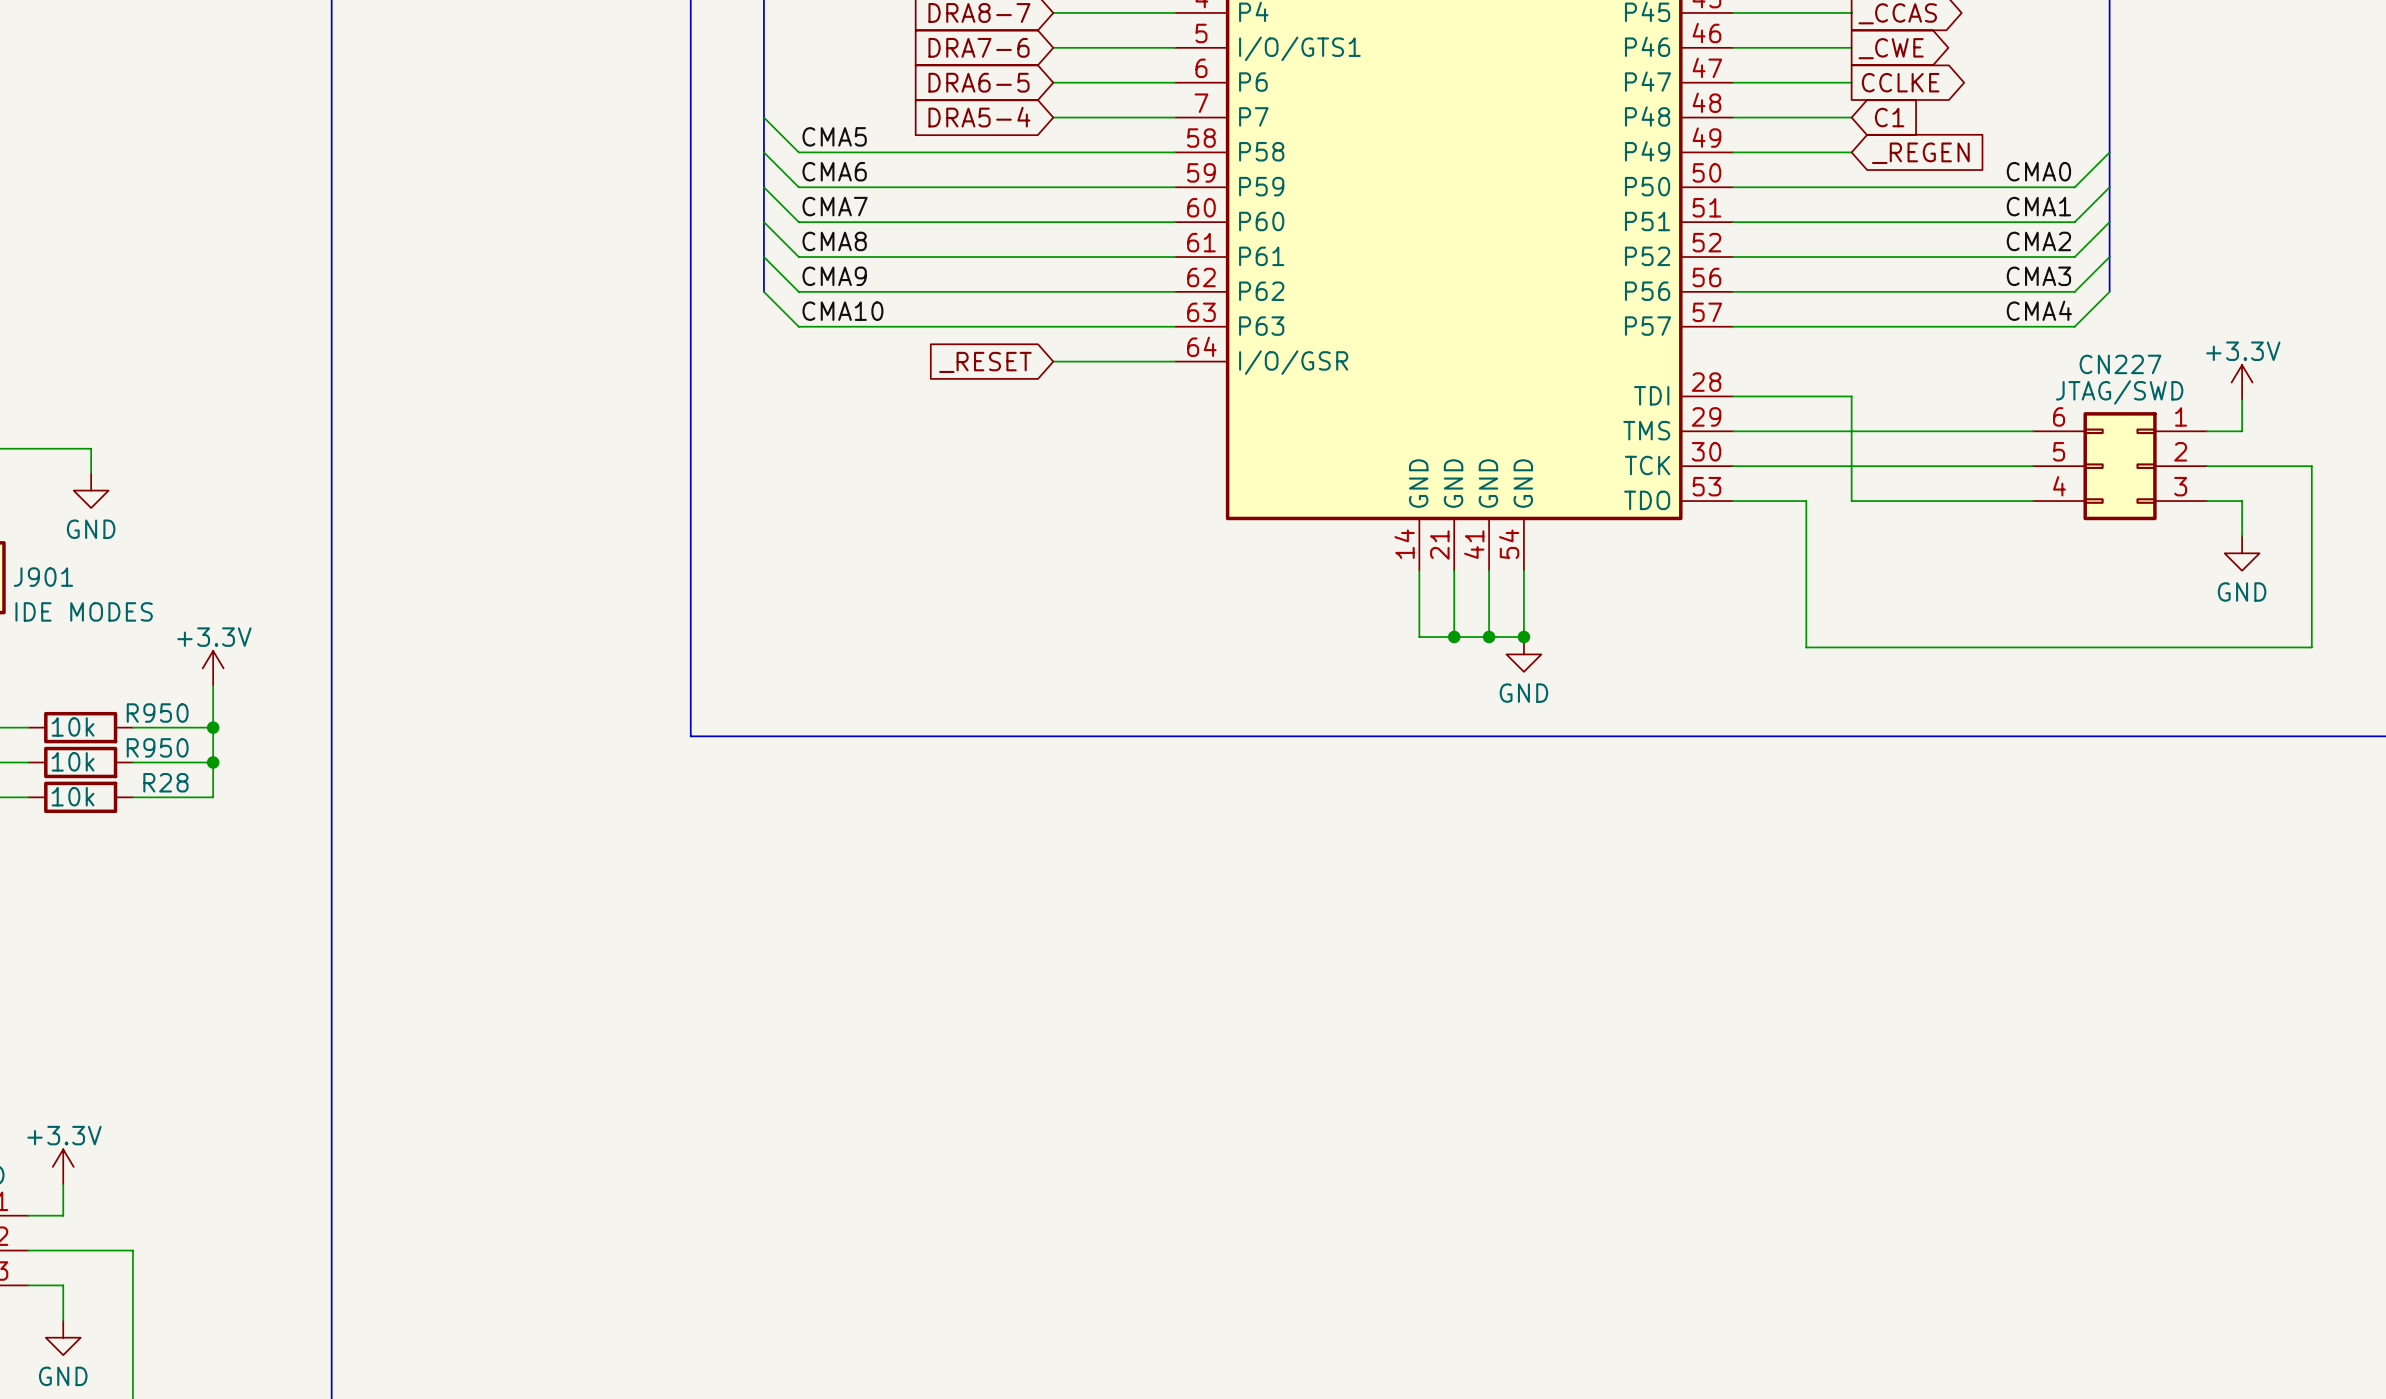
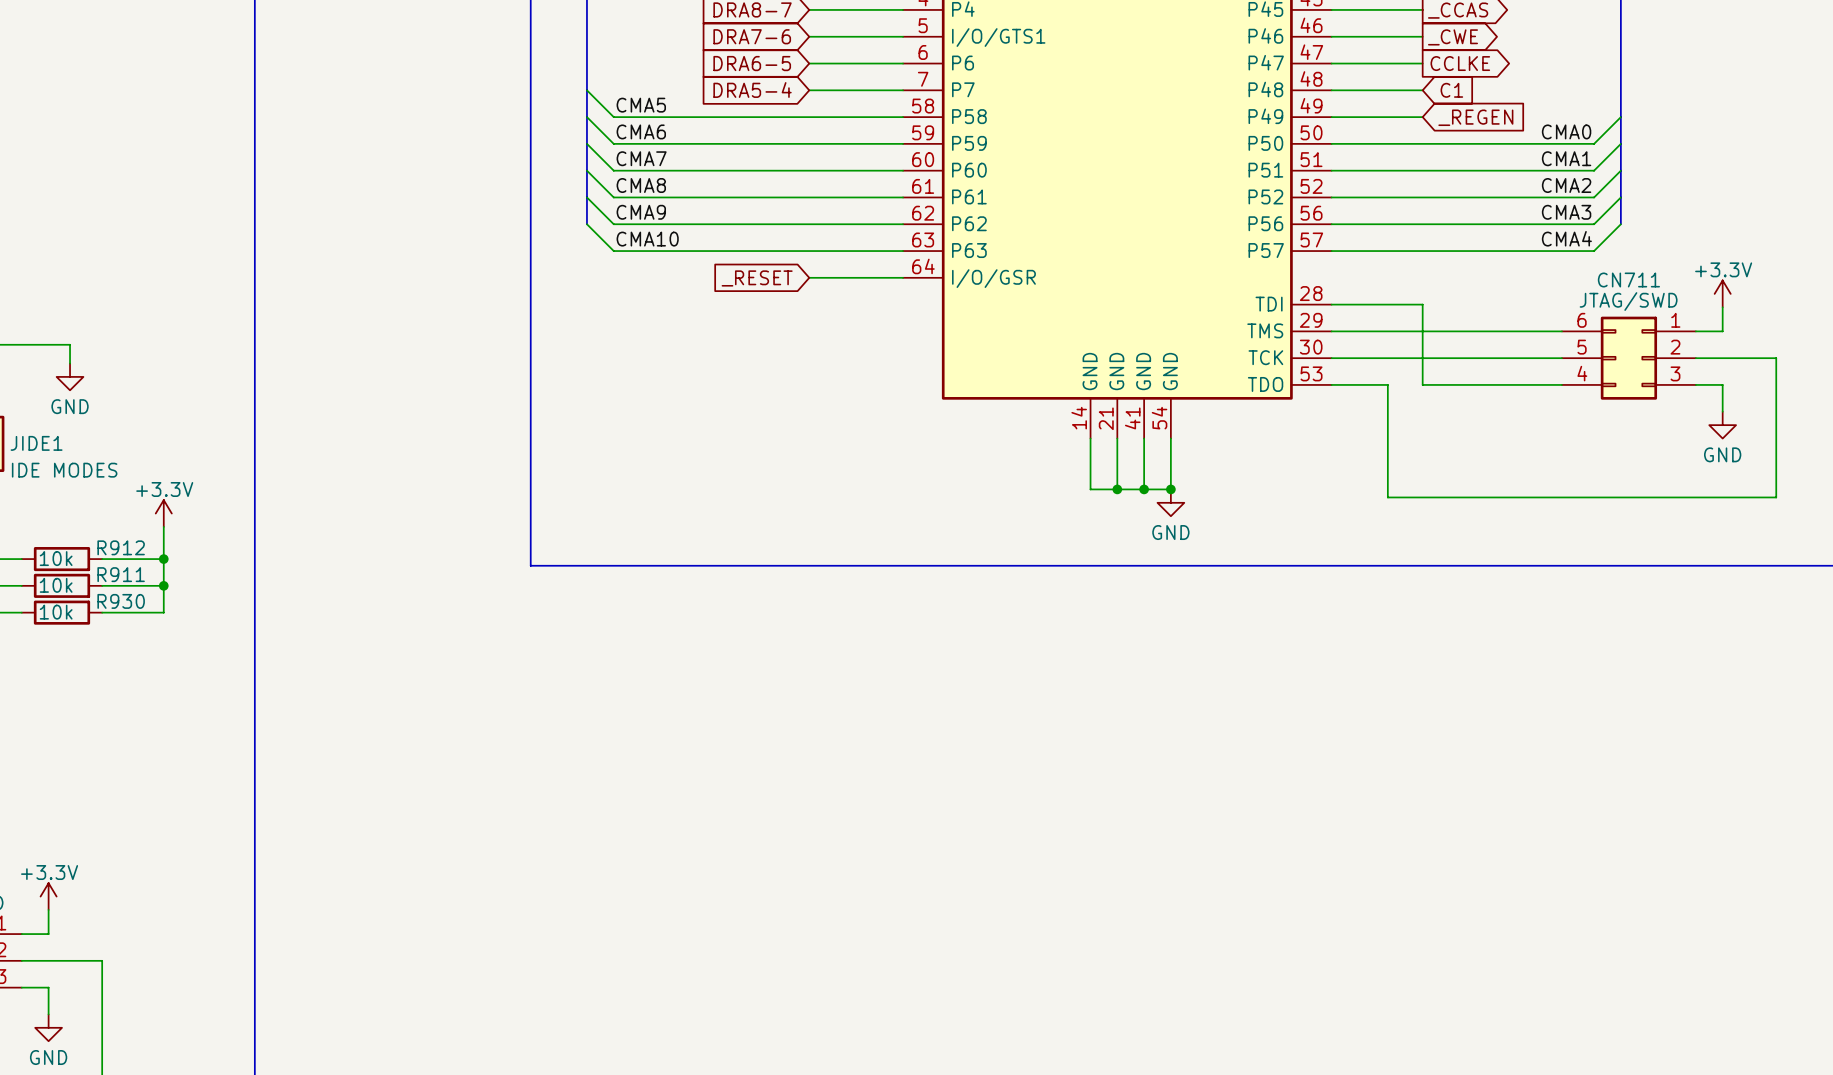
CN227 name: CN227 (2120, 364) -> CN711 (1628, 280)
J901 name: J901 (43, 577) -> JIDE1 (36, 443)
R950 name: R950 (157, 713) -> R912 (121, 547)
R950 name: R950 (157, 747) -> R911 (121, 574)
R28 name: R28 (165, 782) -> R930 (121, 601)

